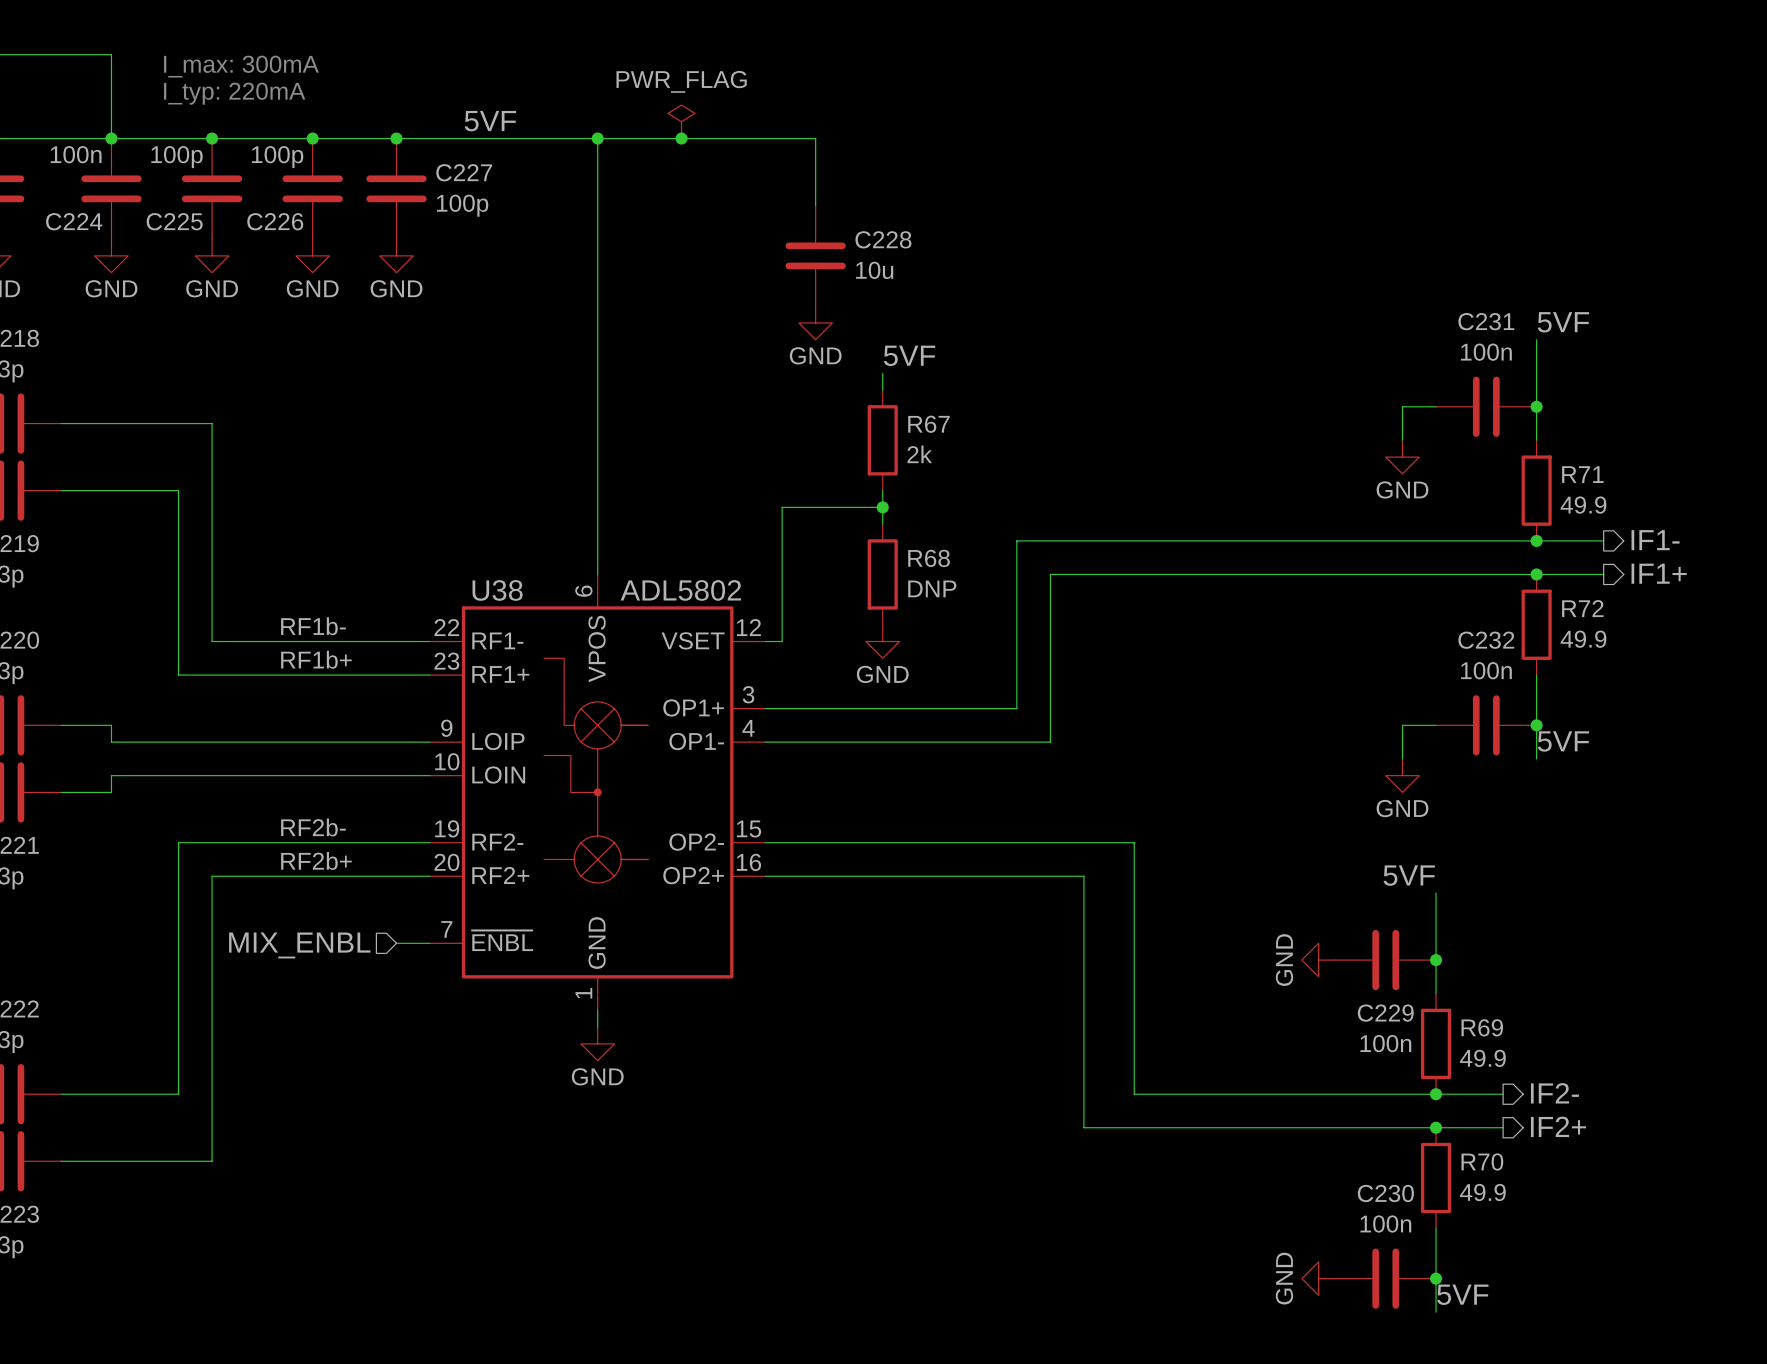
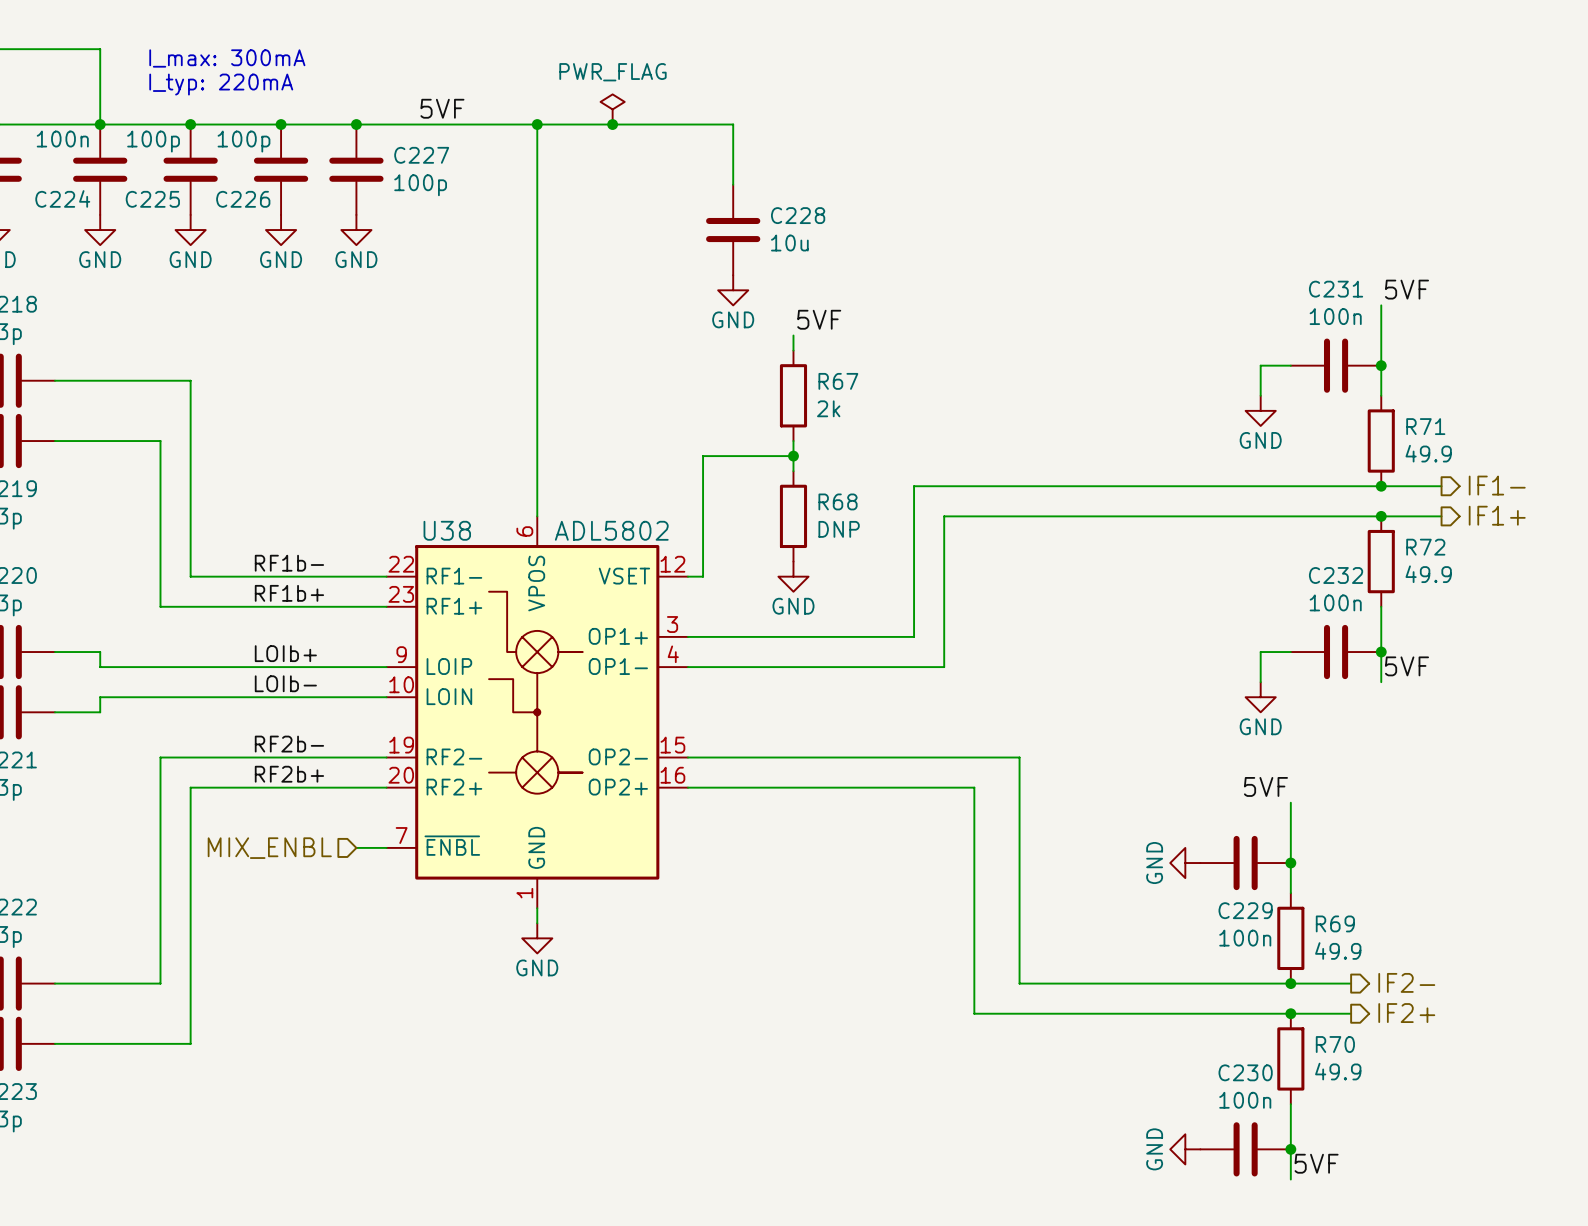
label: none -> LOIb+ (285, 653)
label: none -> LOIb- (285, 683)

